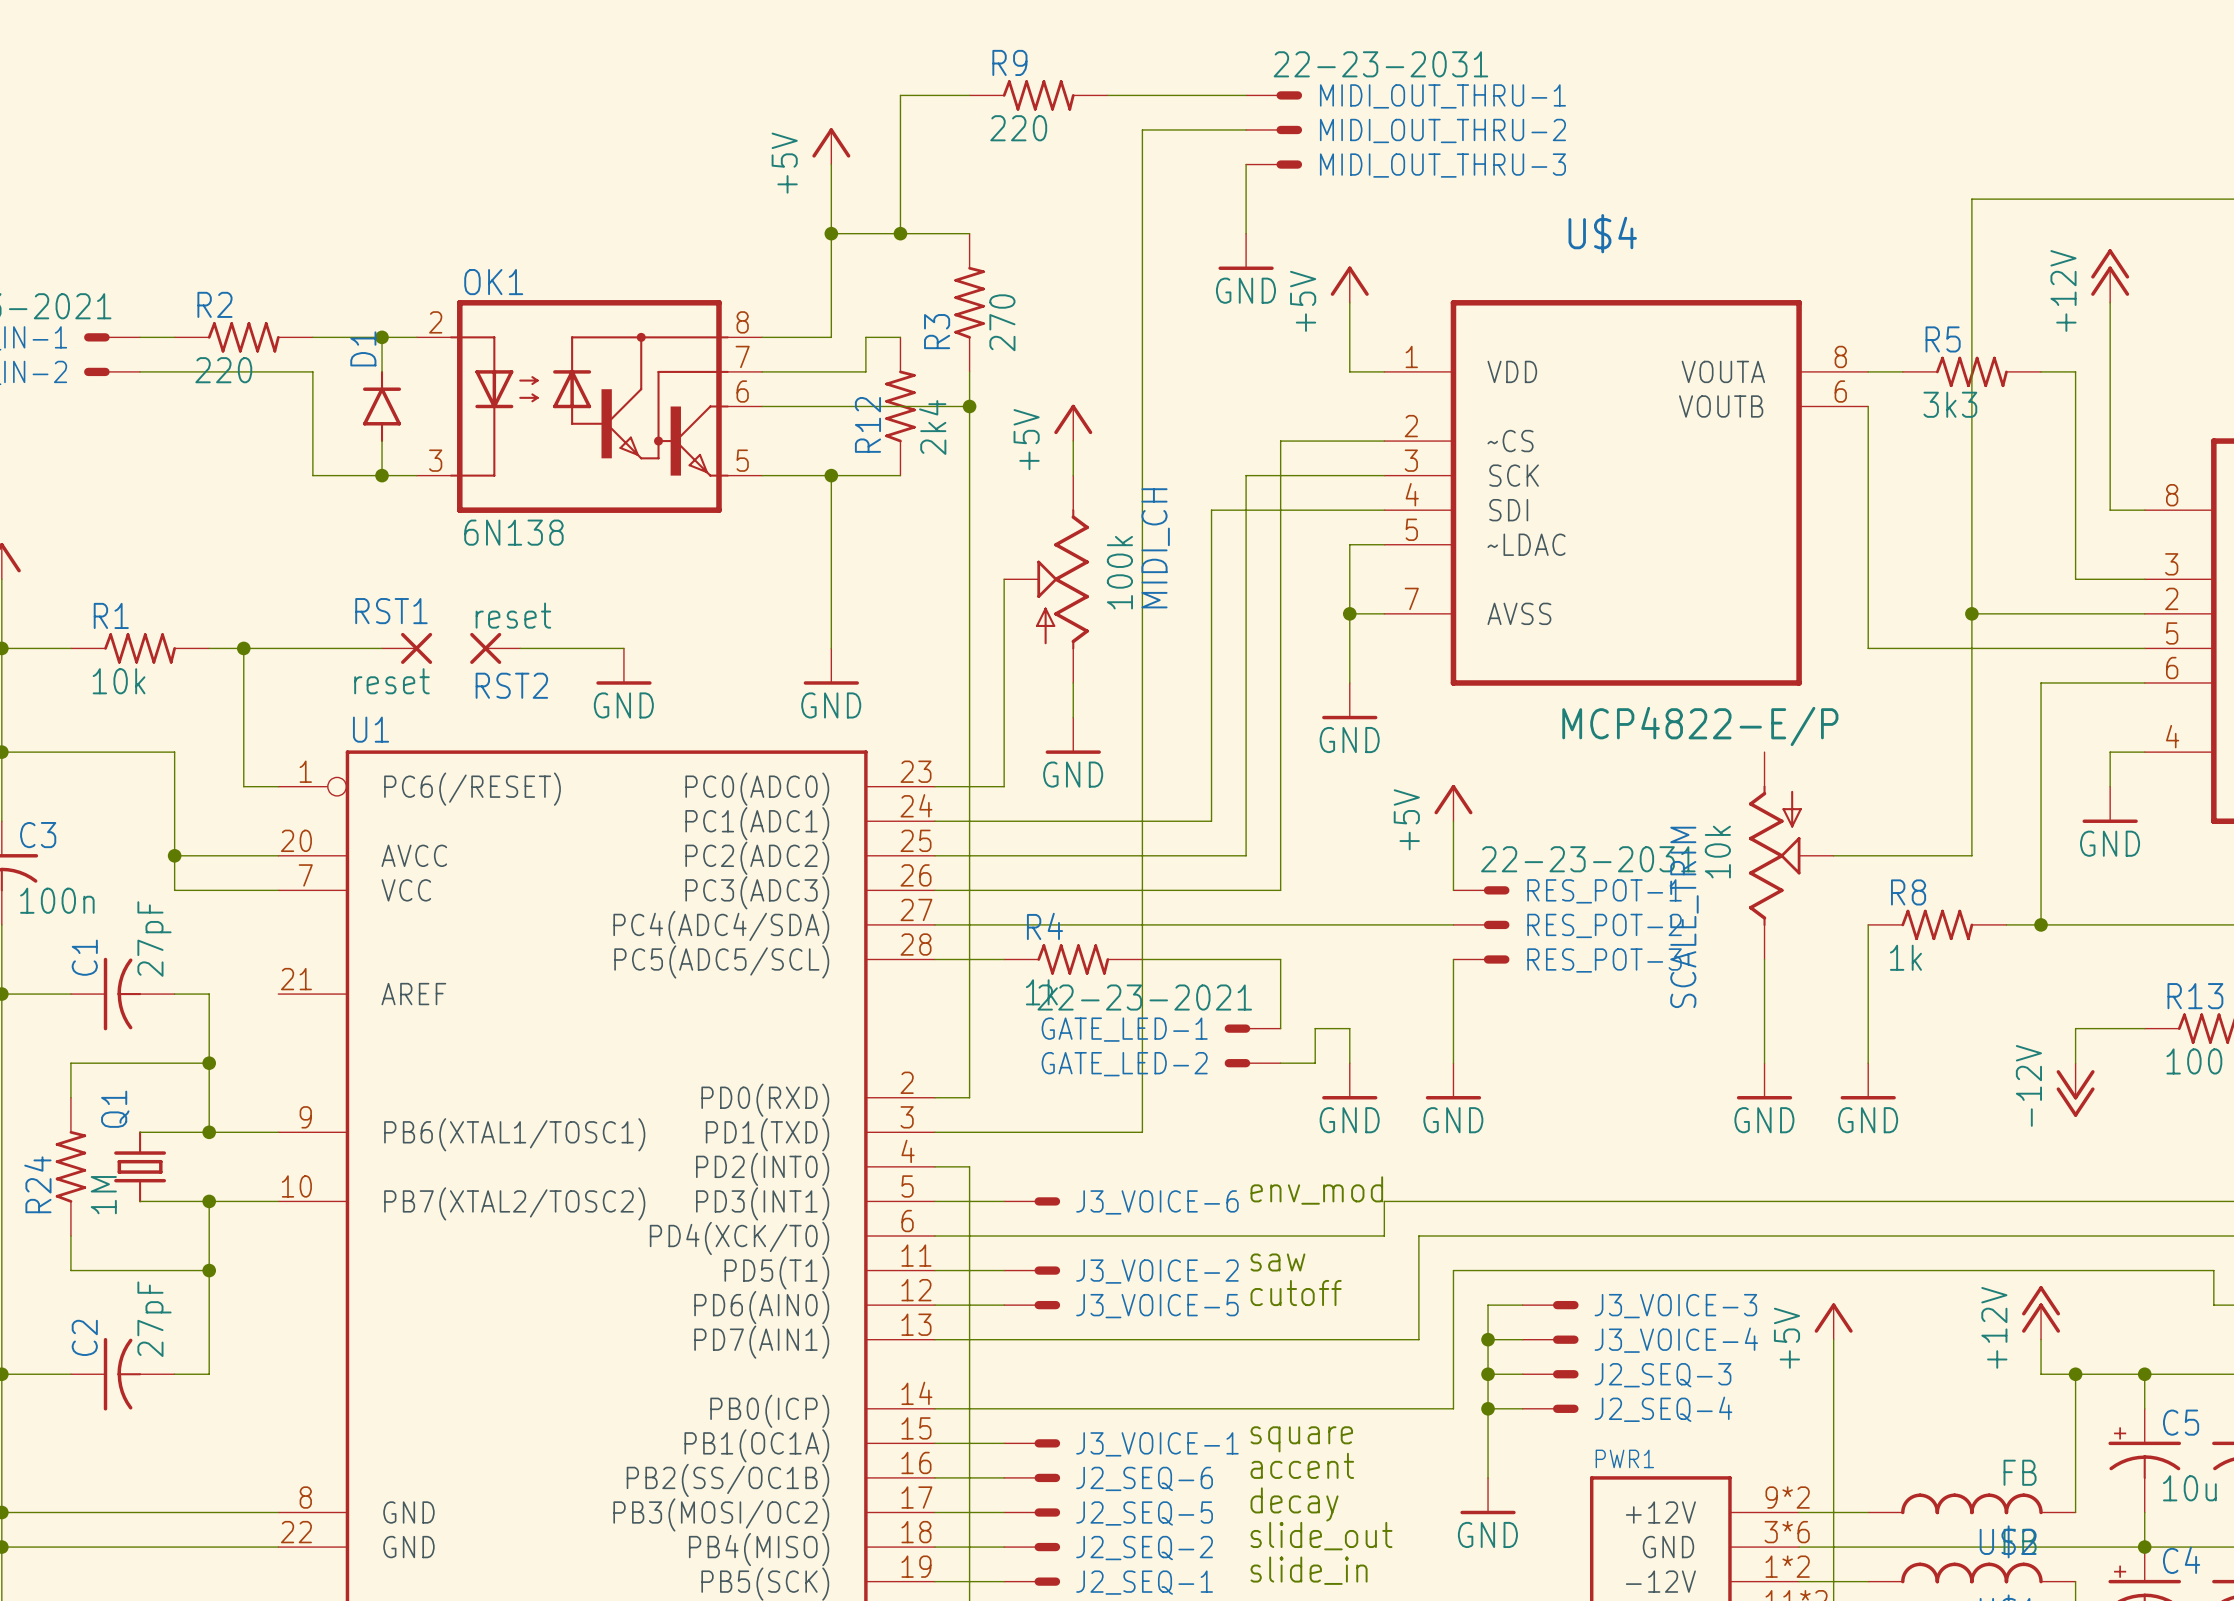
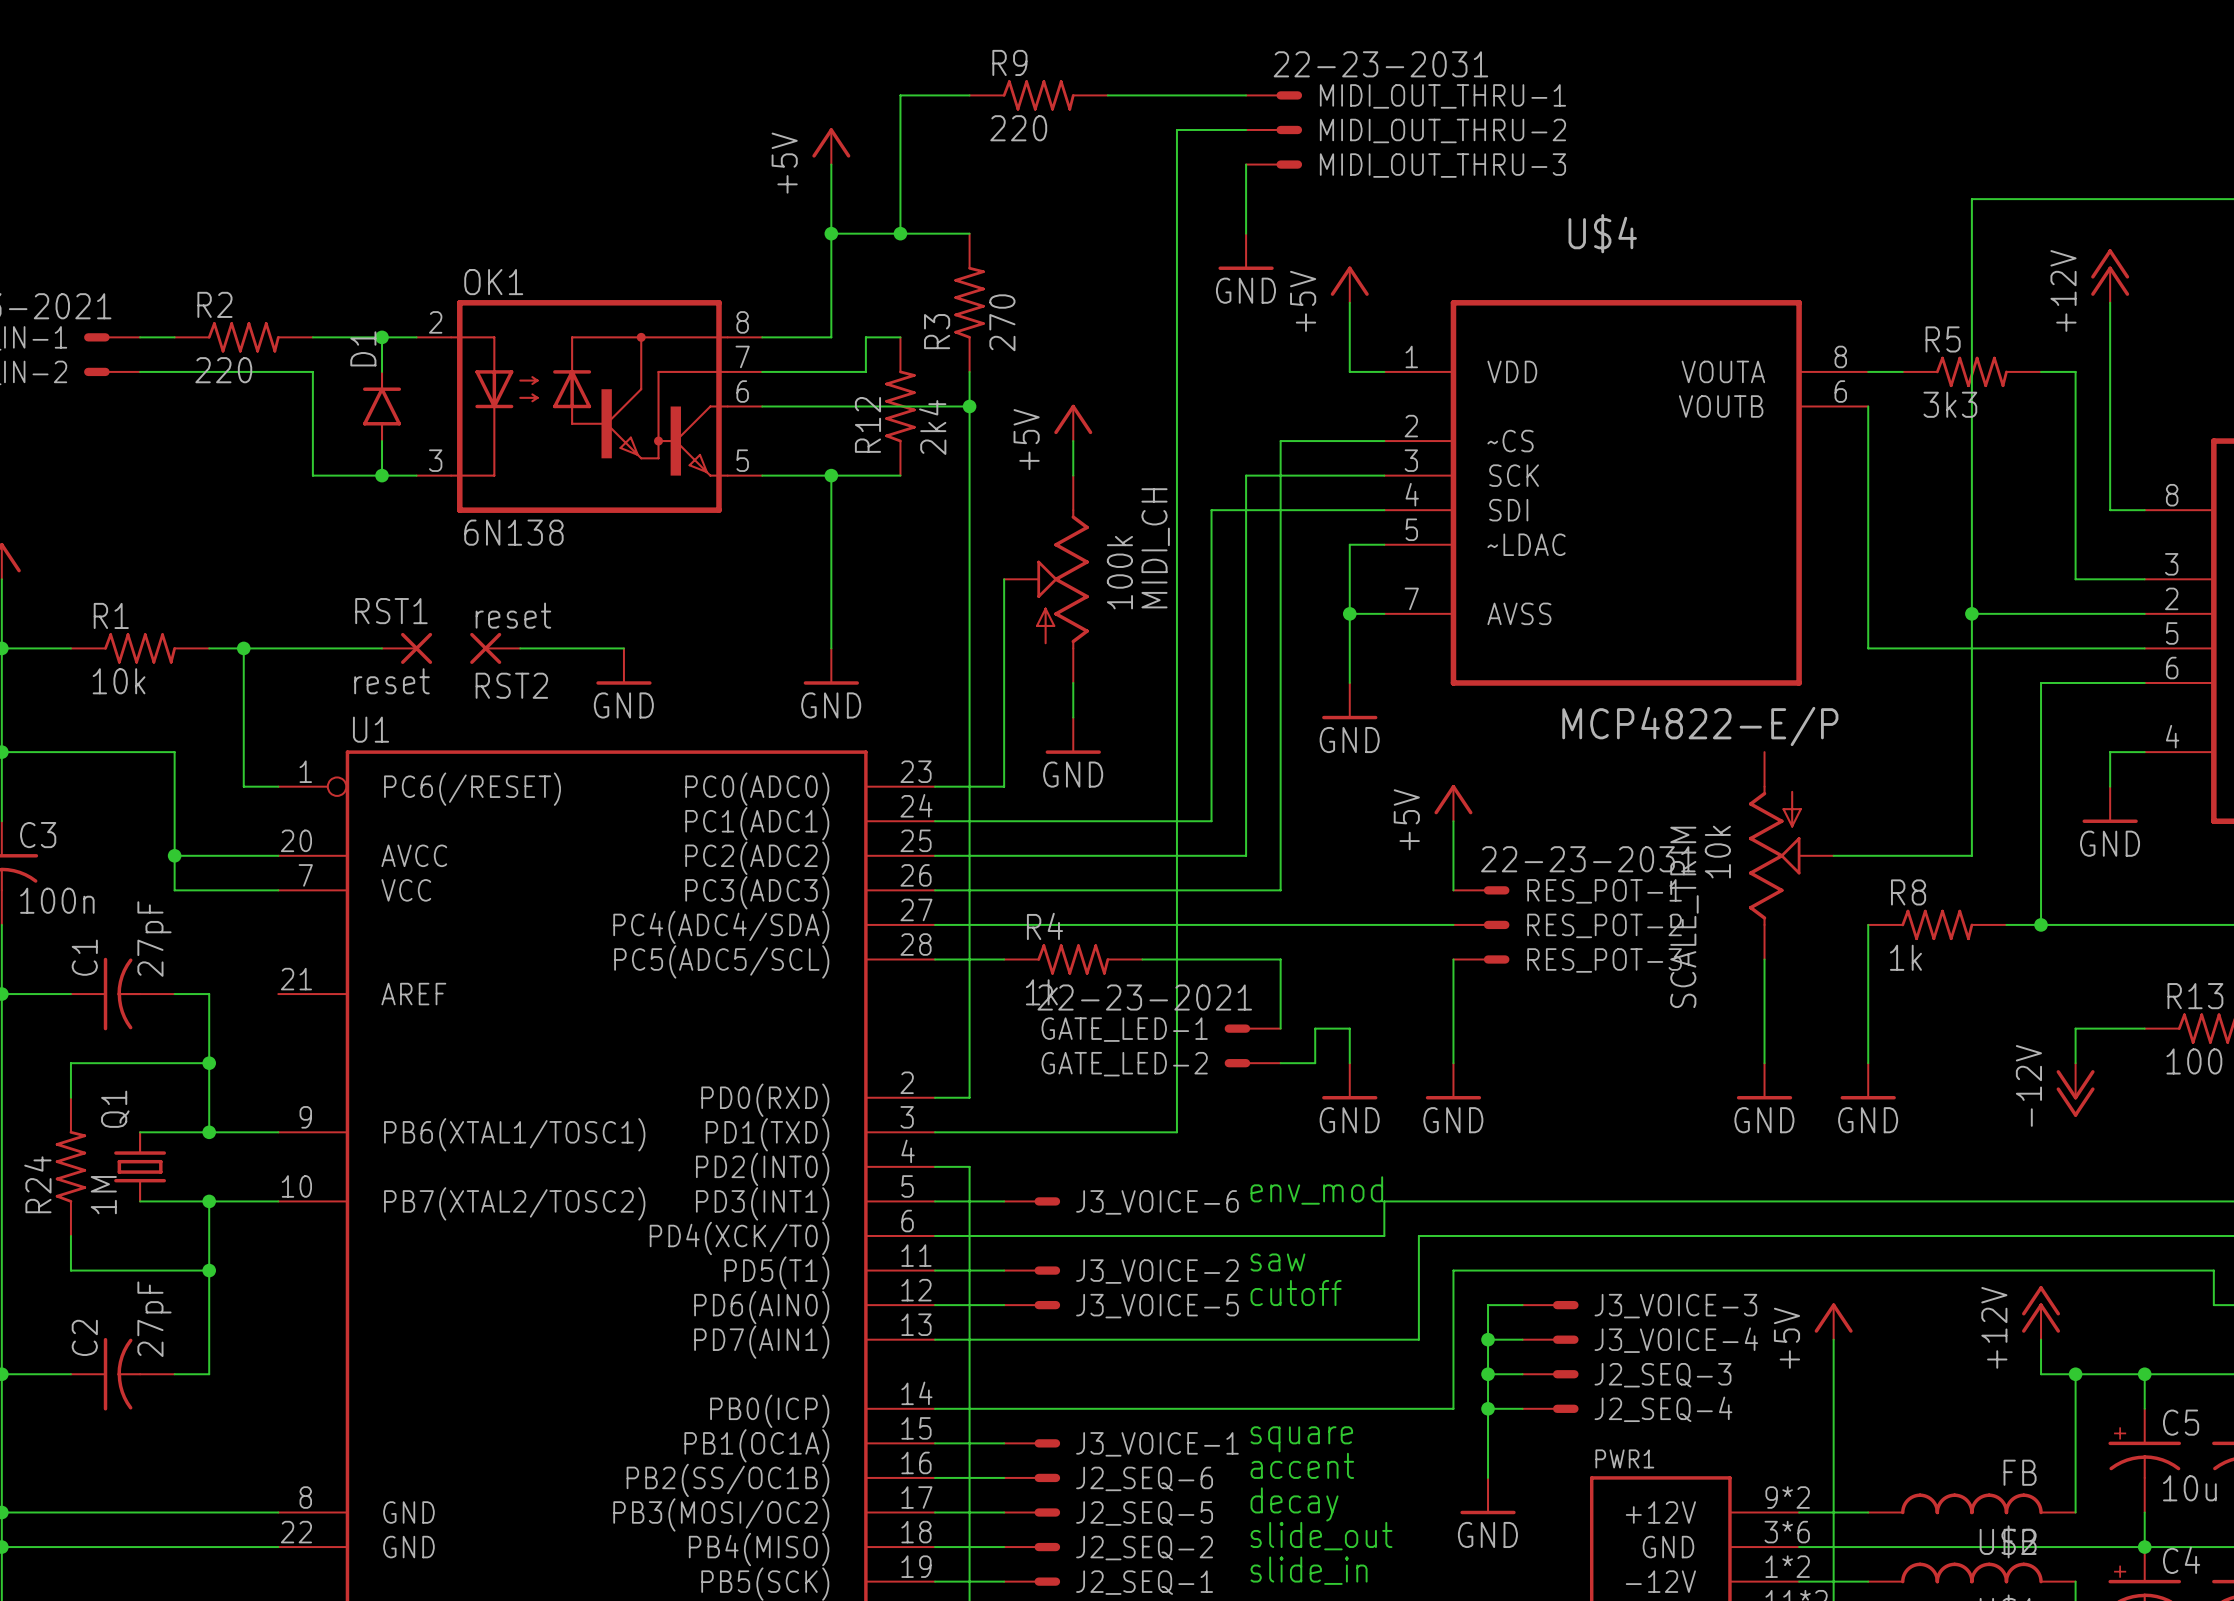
wire: (1176, 129) (1142, 129) (1142, 1132) -> (1176, 129) (1176, 1132) (1142, 1132)

